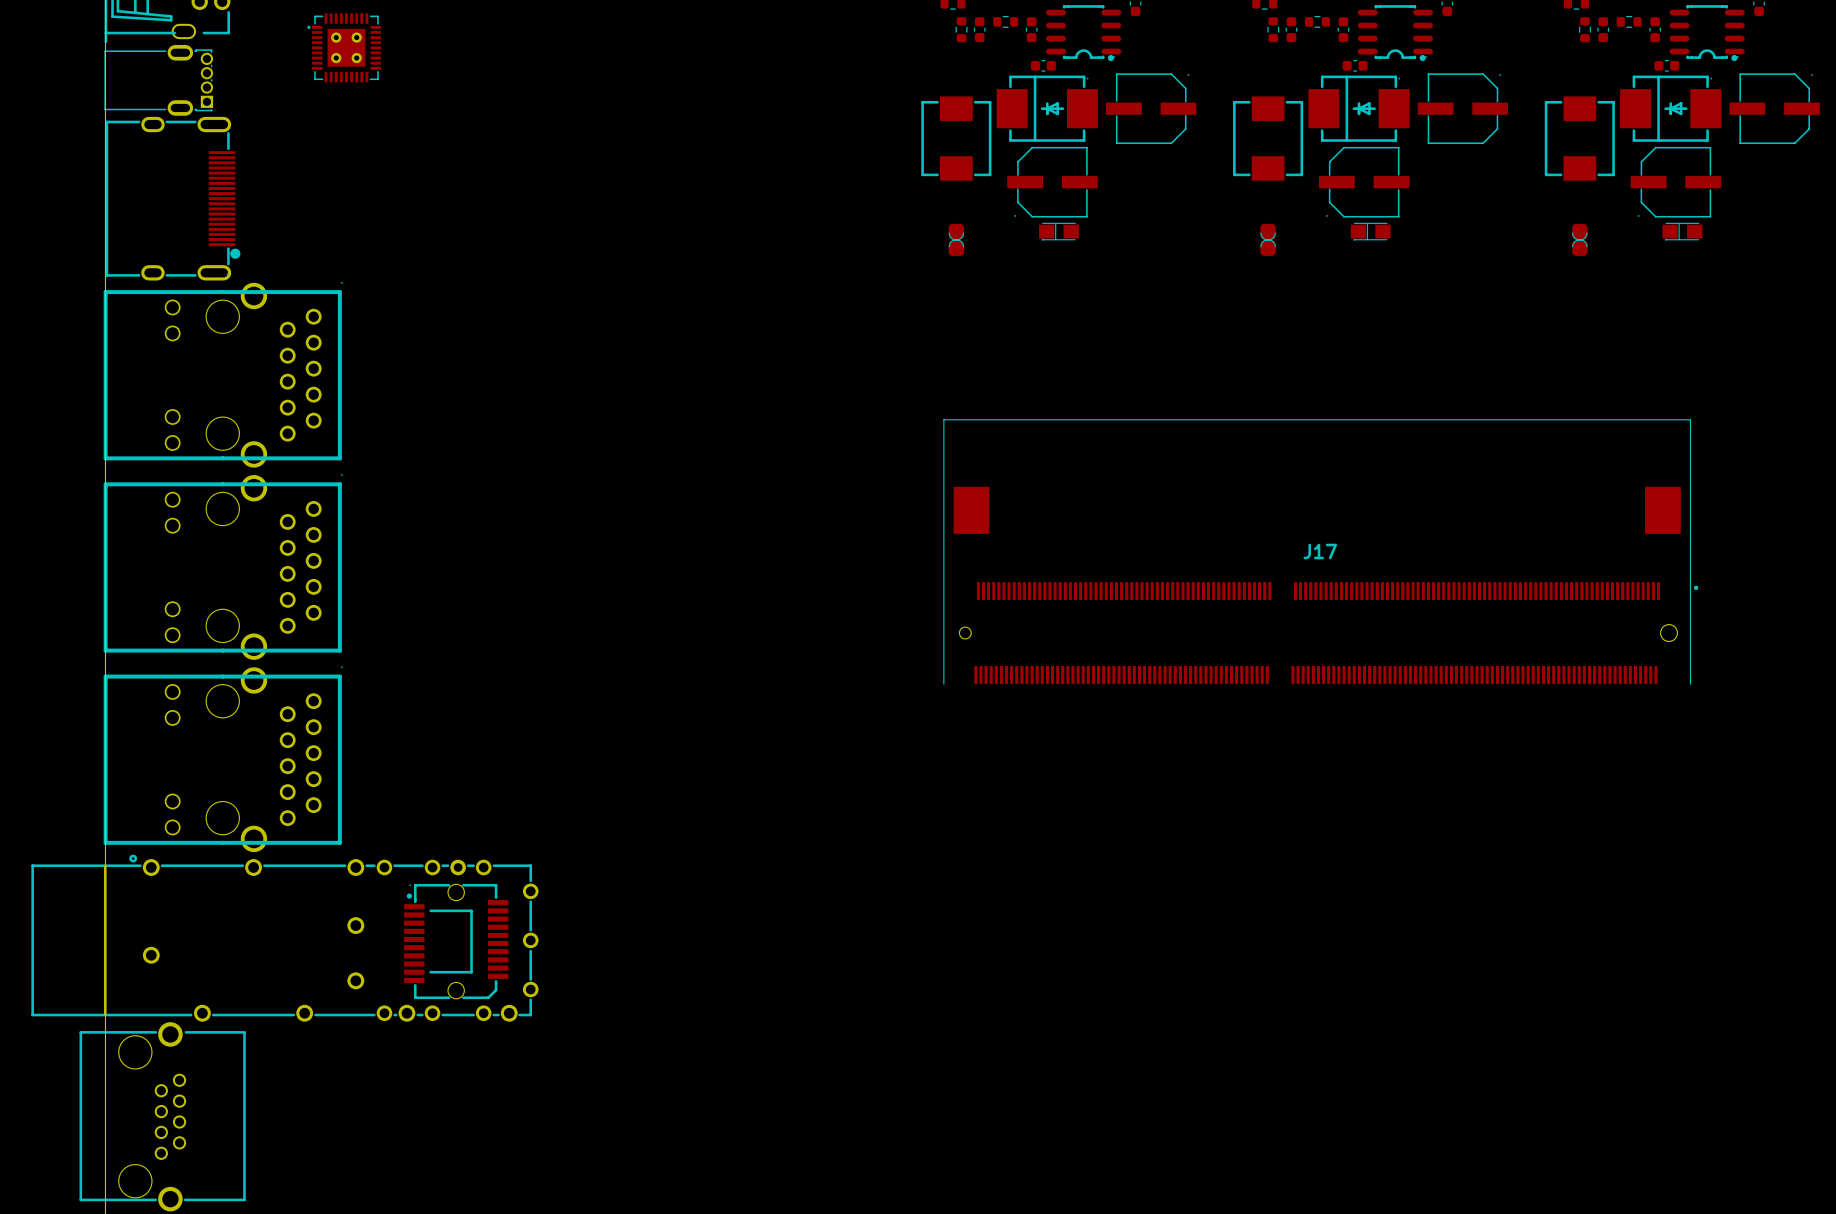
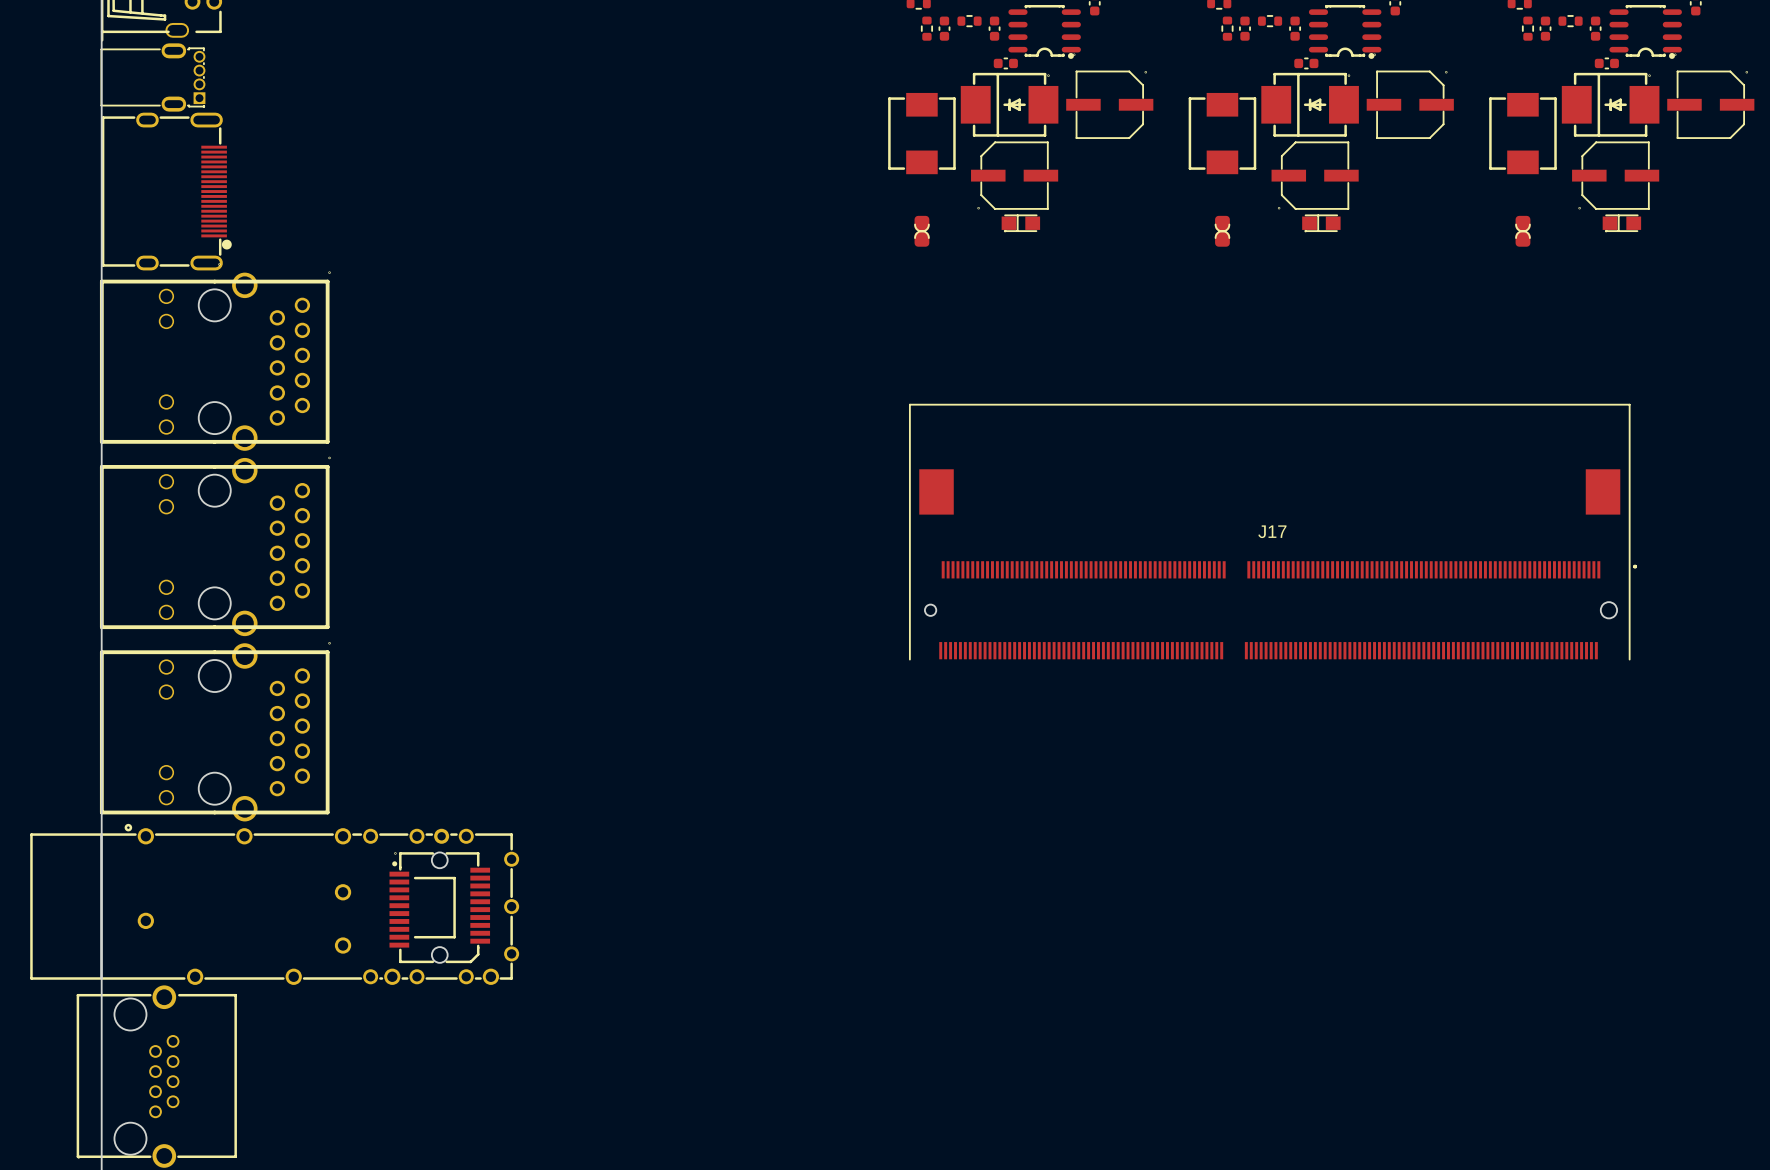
part: (344, 47) -> none

